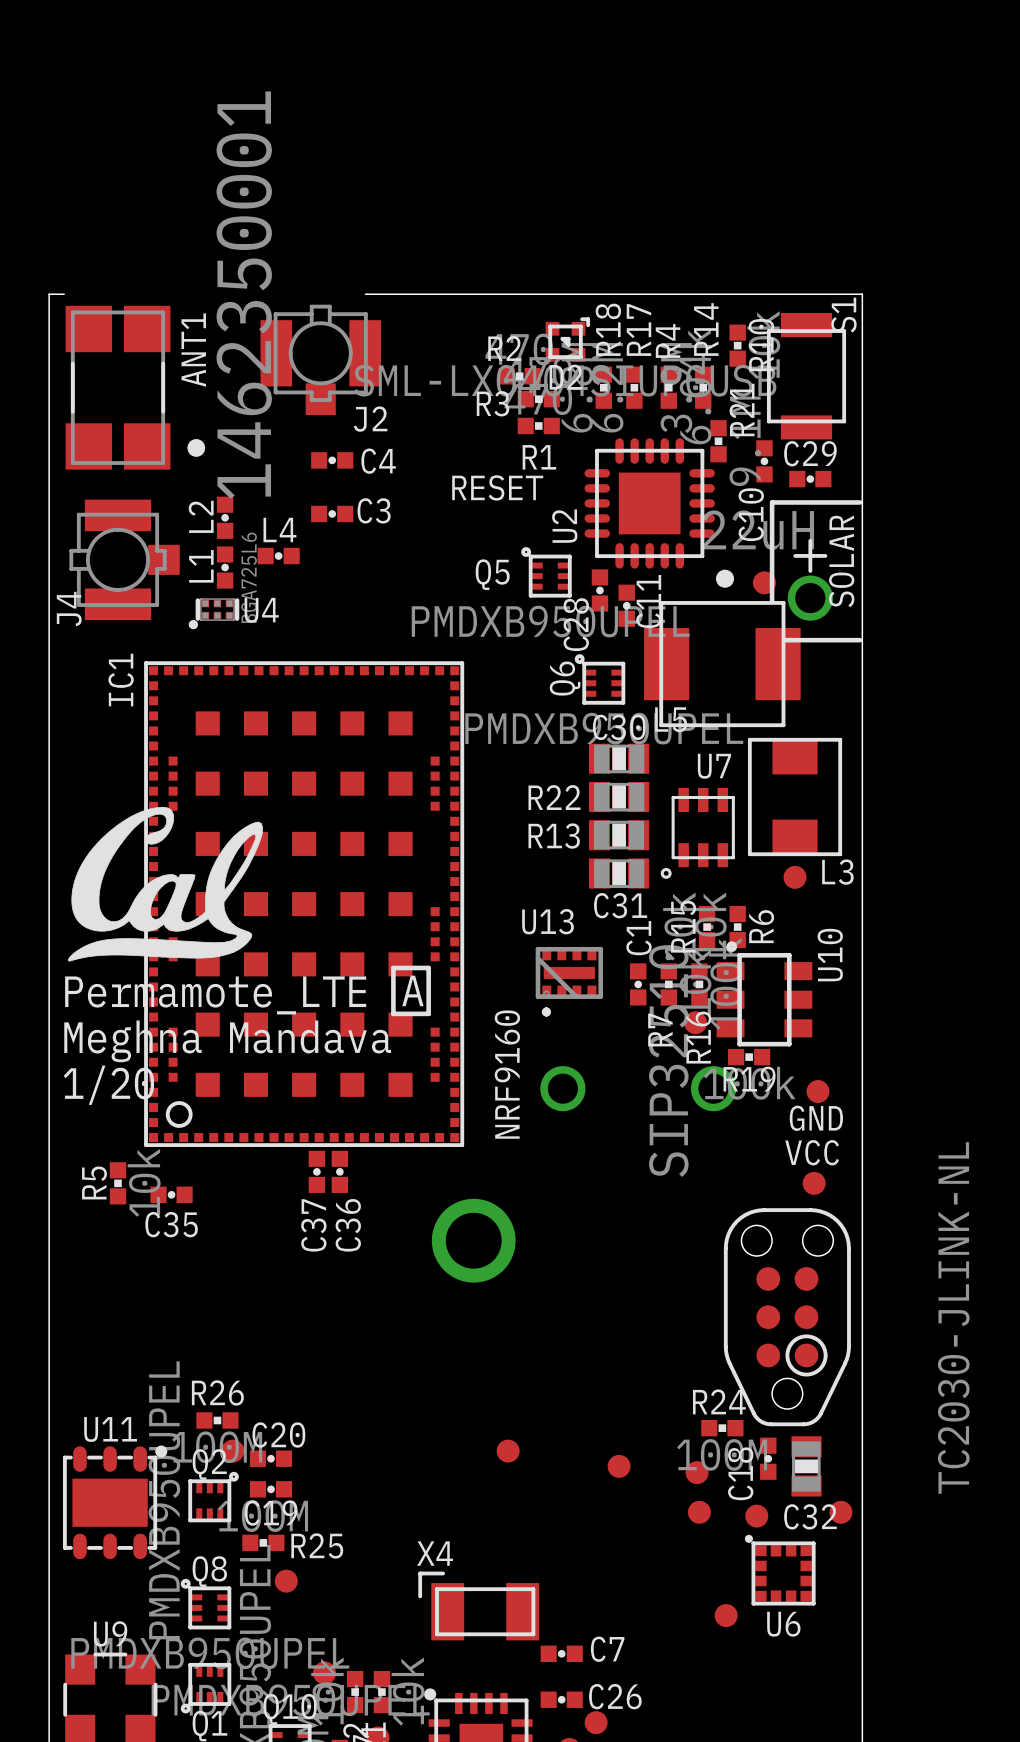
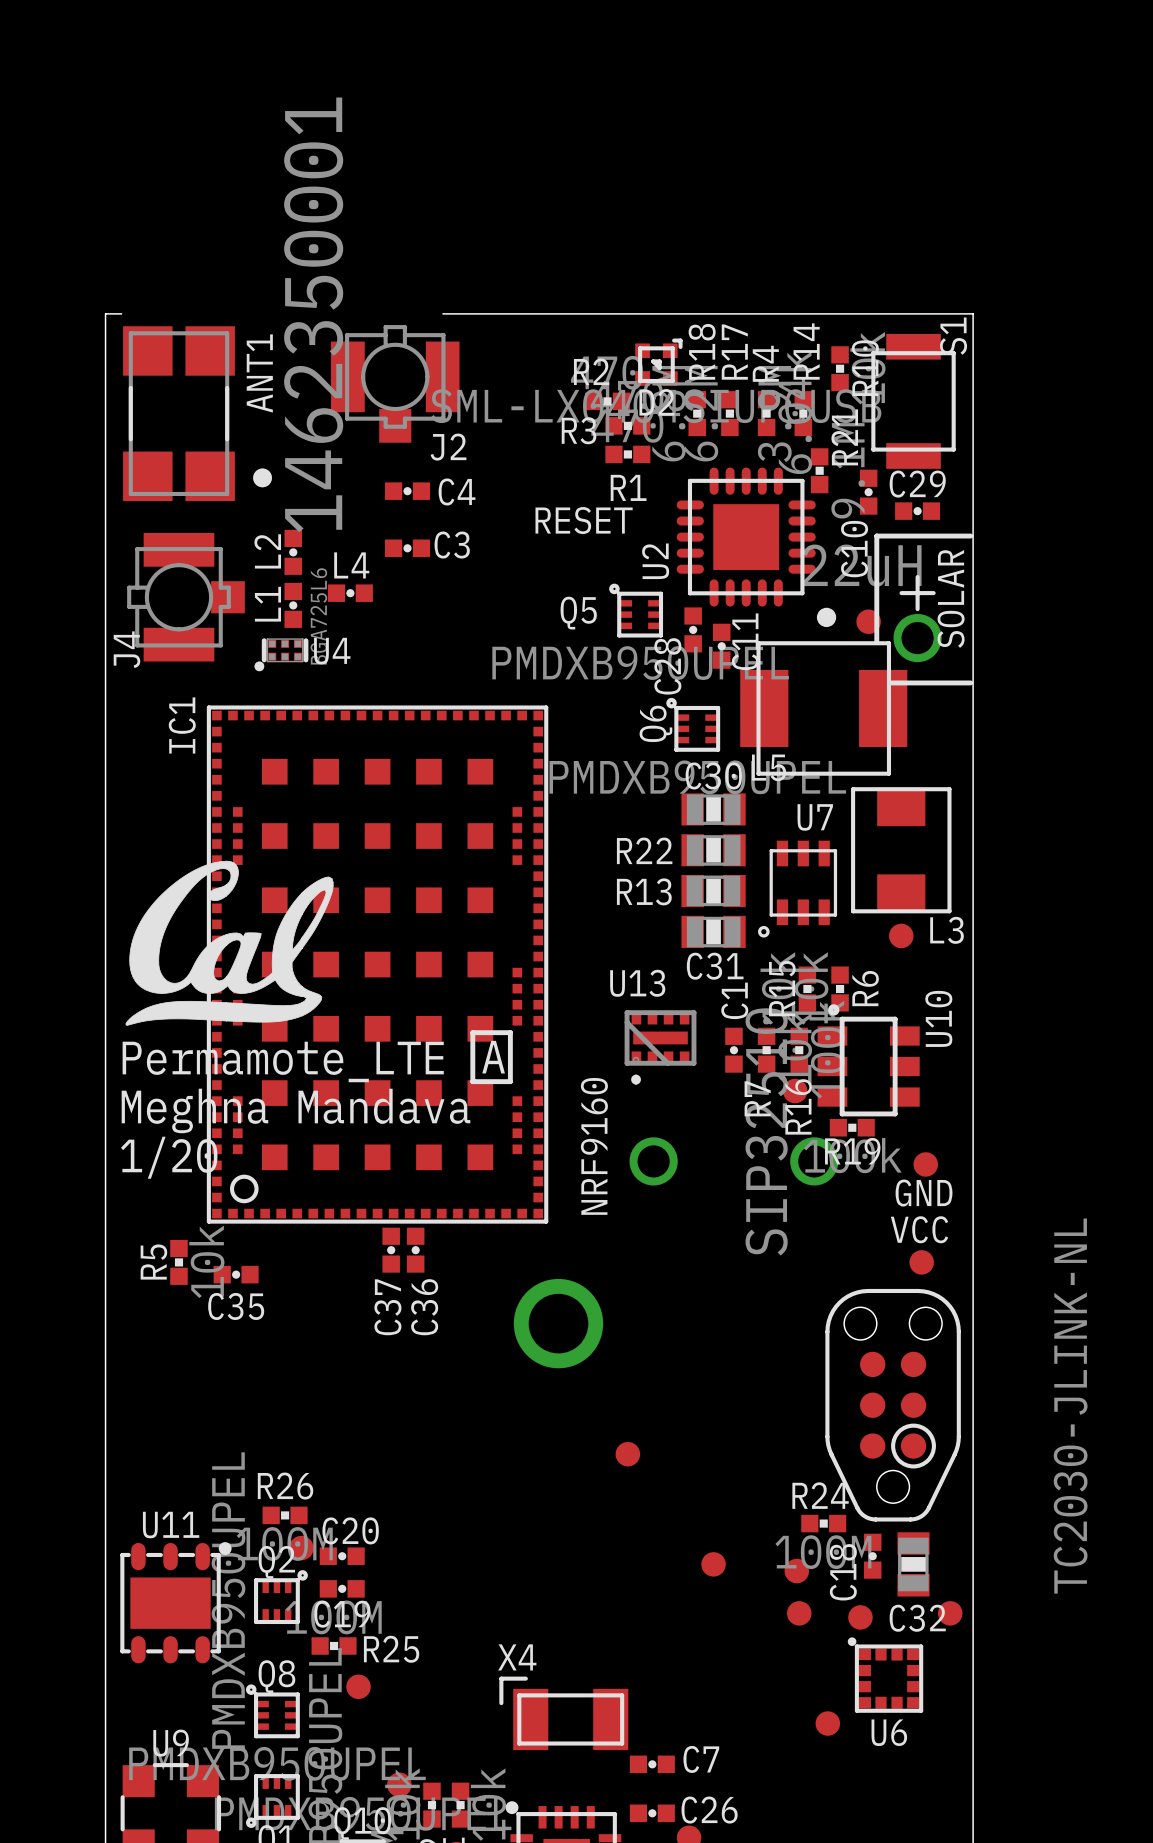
part position: (508, 1451) -> (627, 1454)

